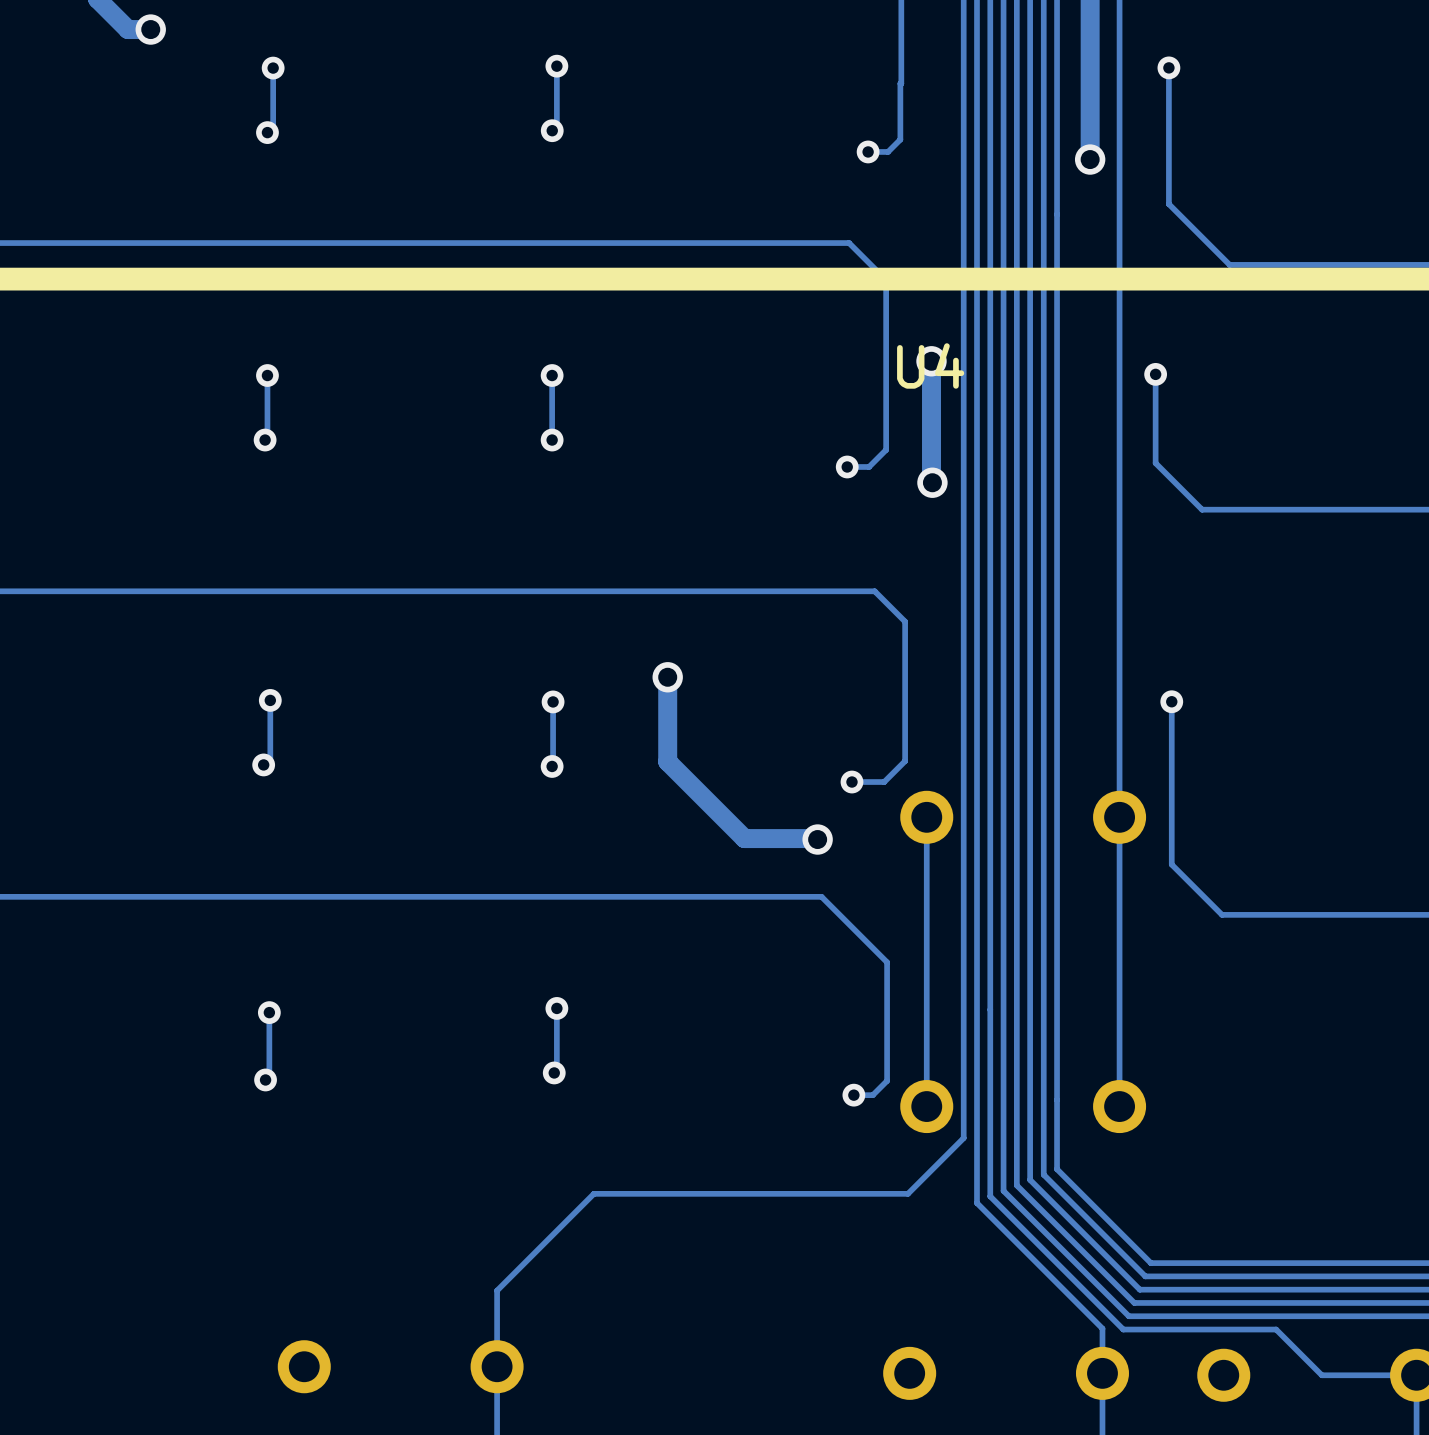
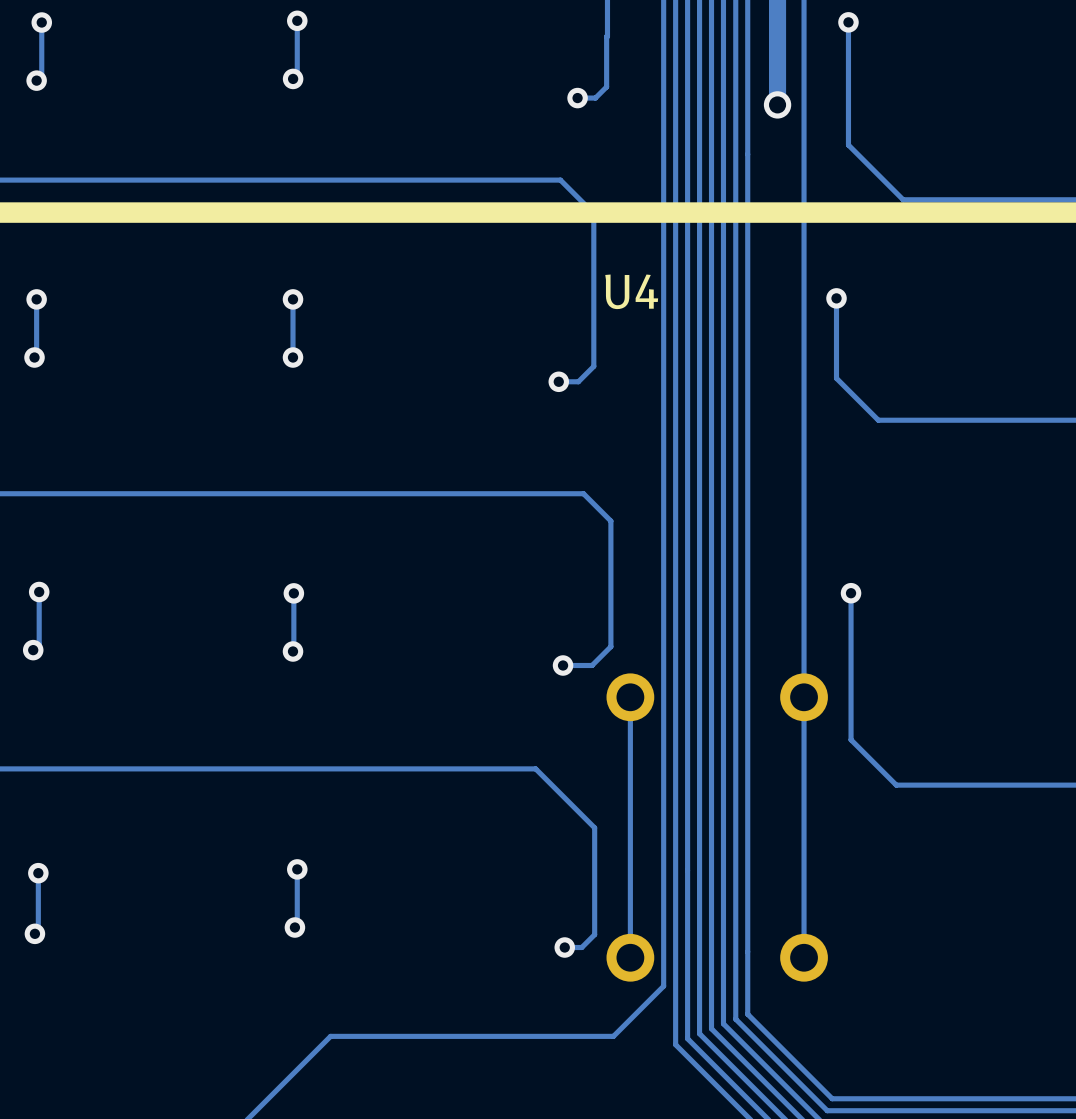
track: (931, 361) (932, 482) -> none
via: (931, 361) -> none
via: (932, 482) -> none
track: (667, 677) (667, 761) (744, 838) (817, 839) -> none
via: (667, 677) -> none
via: (817, 839) -> none

